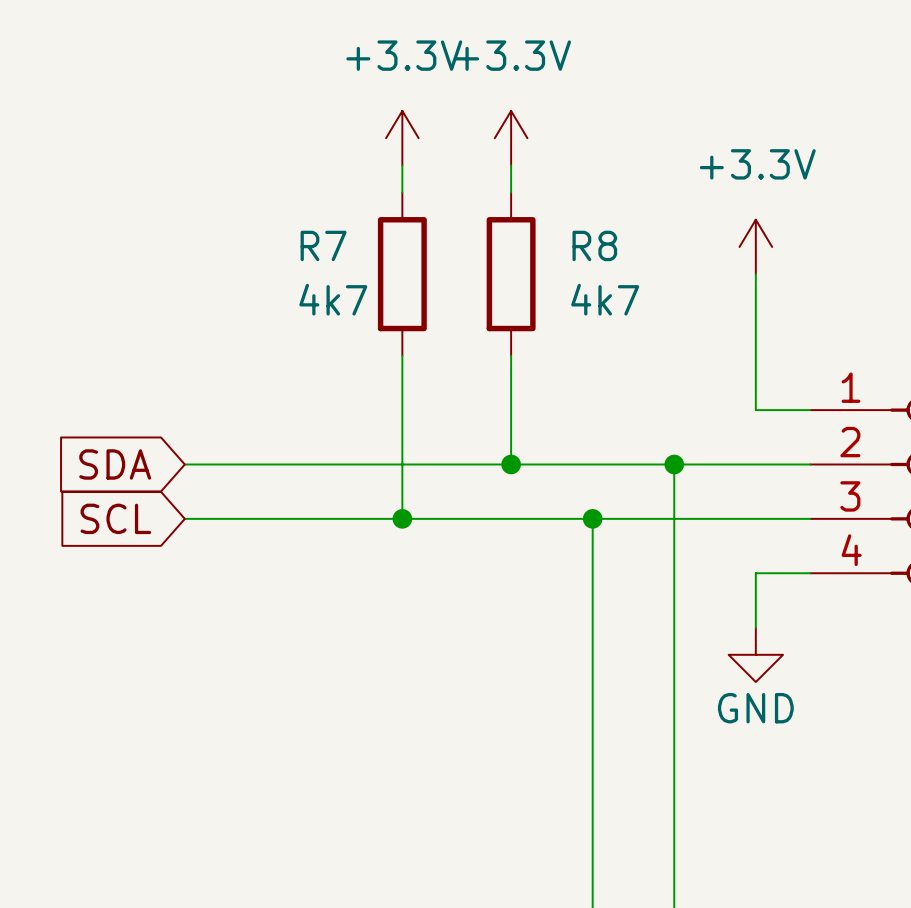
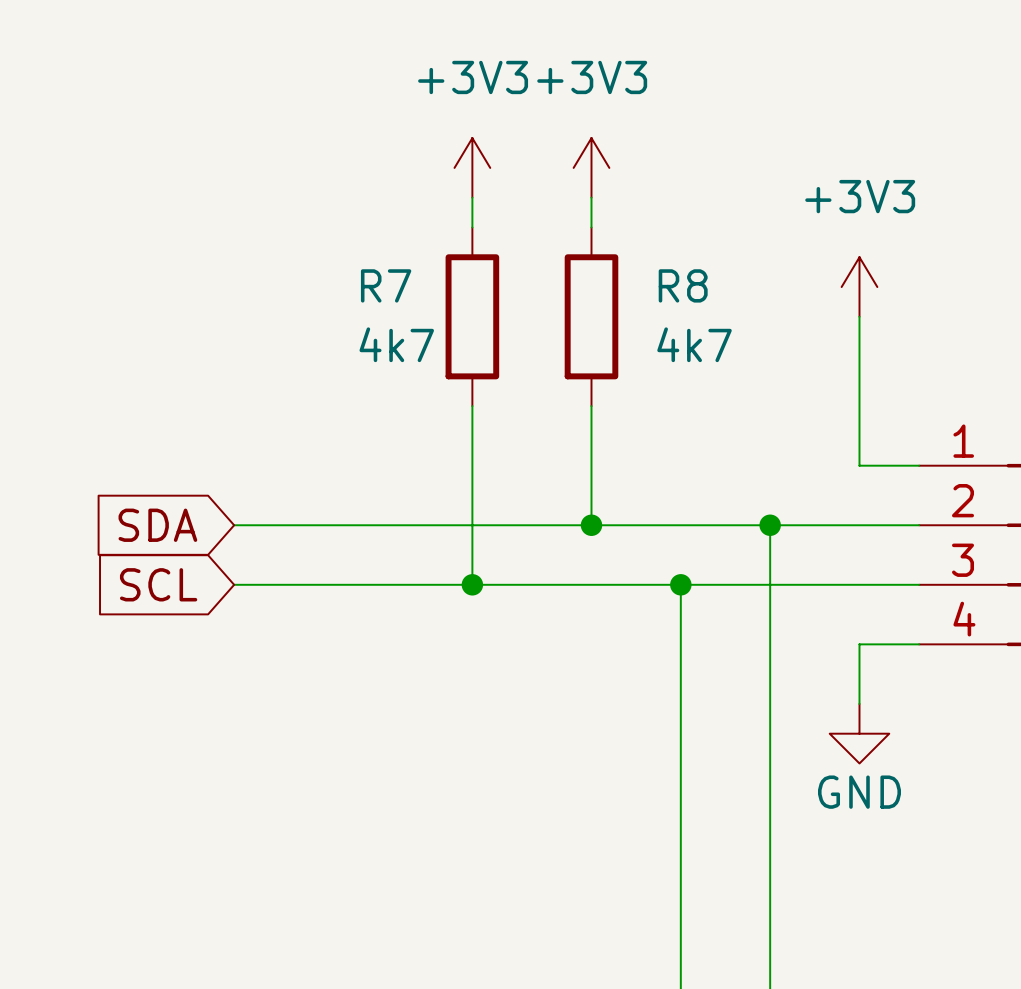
power symbol: +3.3V (402, 138) -> +3V3 (472, 167)
power symbol: +3.3V (511, 138) -> +3V3 (591, 167)
power symbol: +3.3V (755, 246) -> +3V3 (859, 287)

